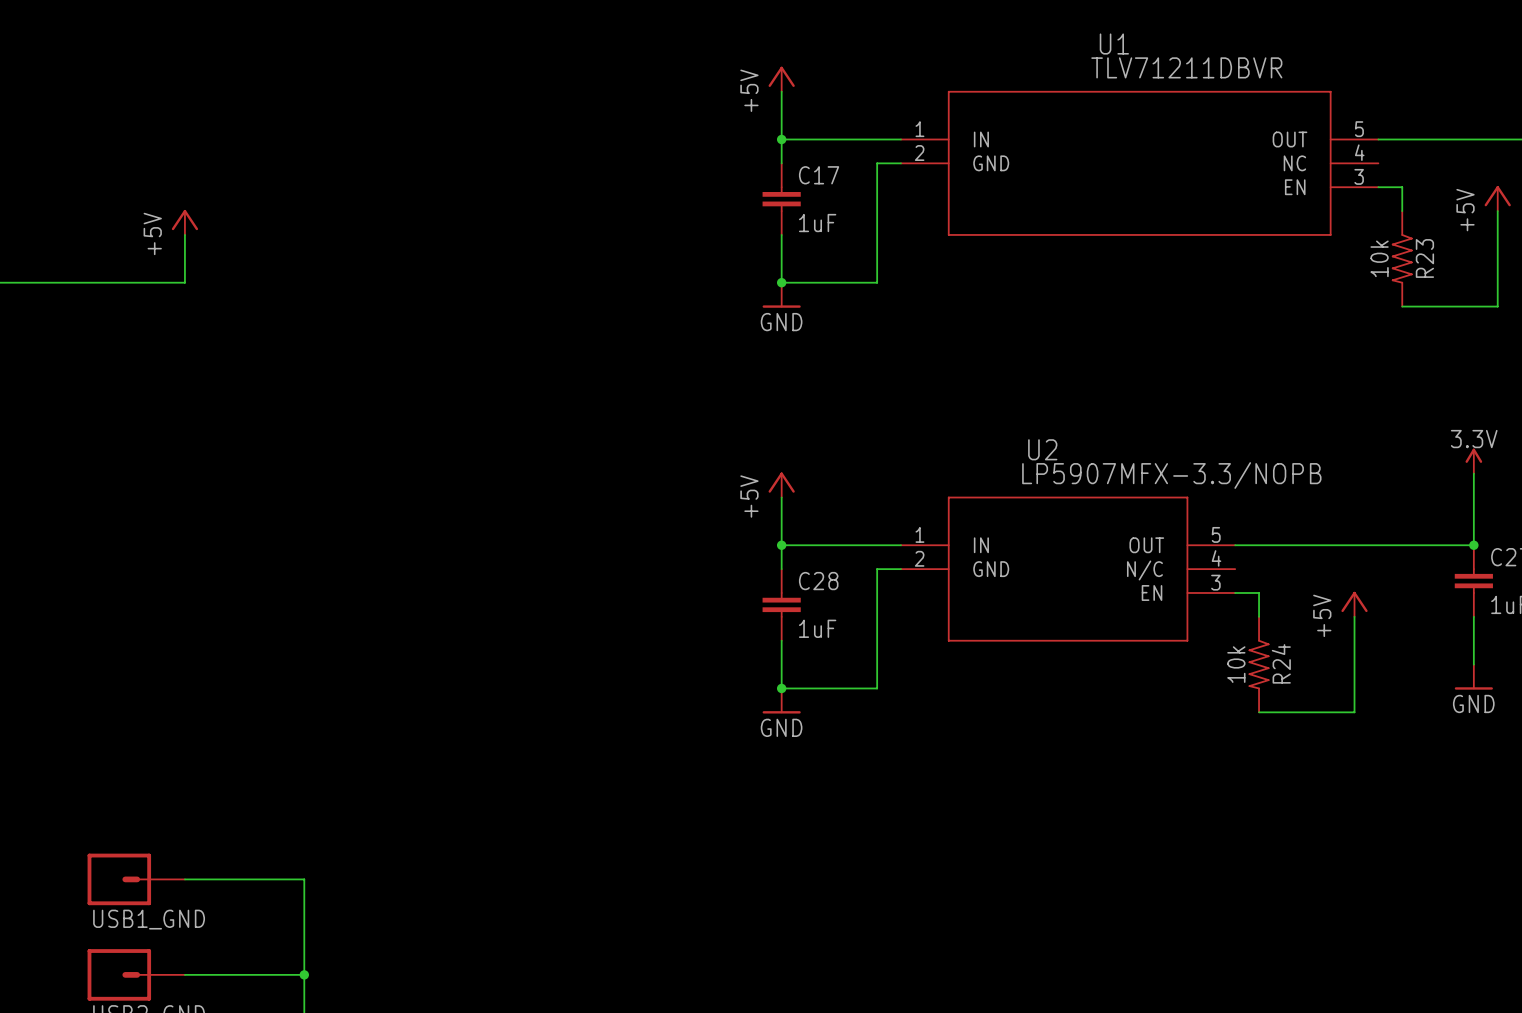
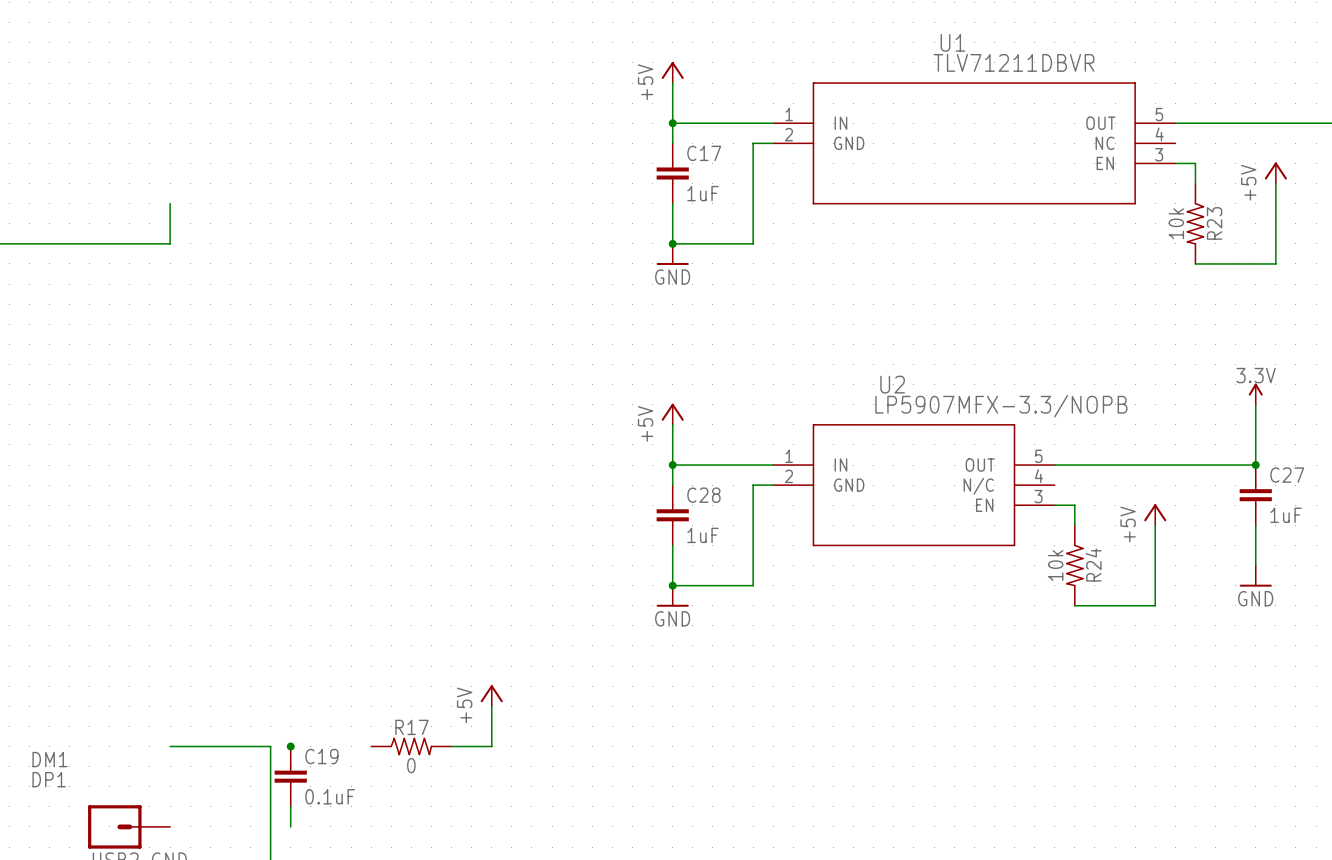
power symbol: +5V (184, 222) -> none
power symbol: none -> +5V (491, 695)
wire: none -> (491, 706) (491, 746) (451, 746)
USB1_GND: (136, 879) -> none
junction: none -> (290, 746)
R17: none -> 0 (411, 746)
label: none -> DM1 (50, 759)
C19: none -> 0.1uF (290, 776)
label: none -> DP1 (49, 779)
wire: none -> (290, 806) (290, 826)
wire: (184, 974) (304, 974) -> none
junction: (304, 974) -> none

